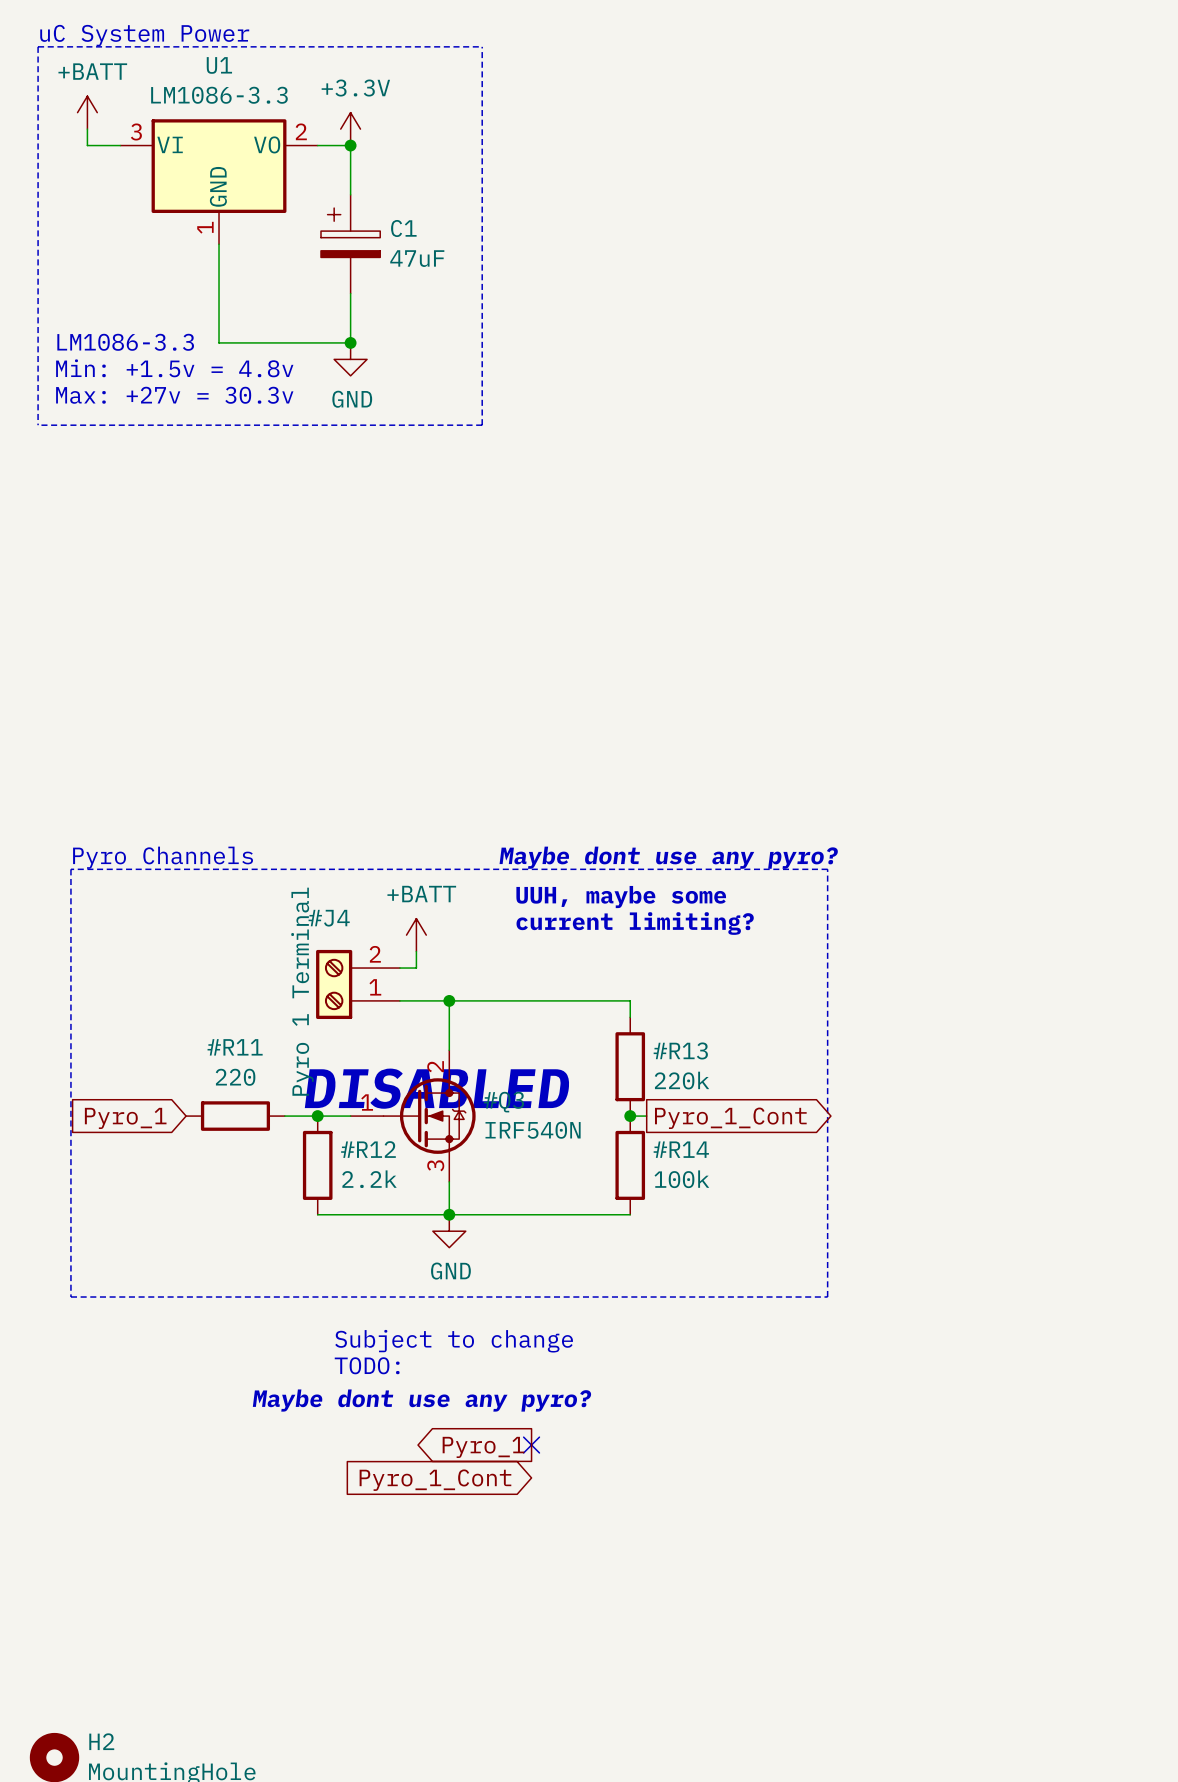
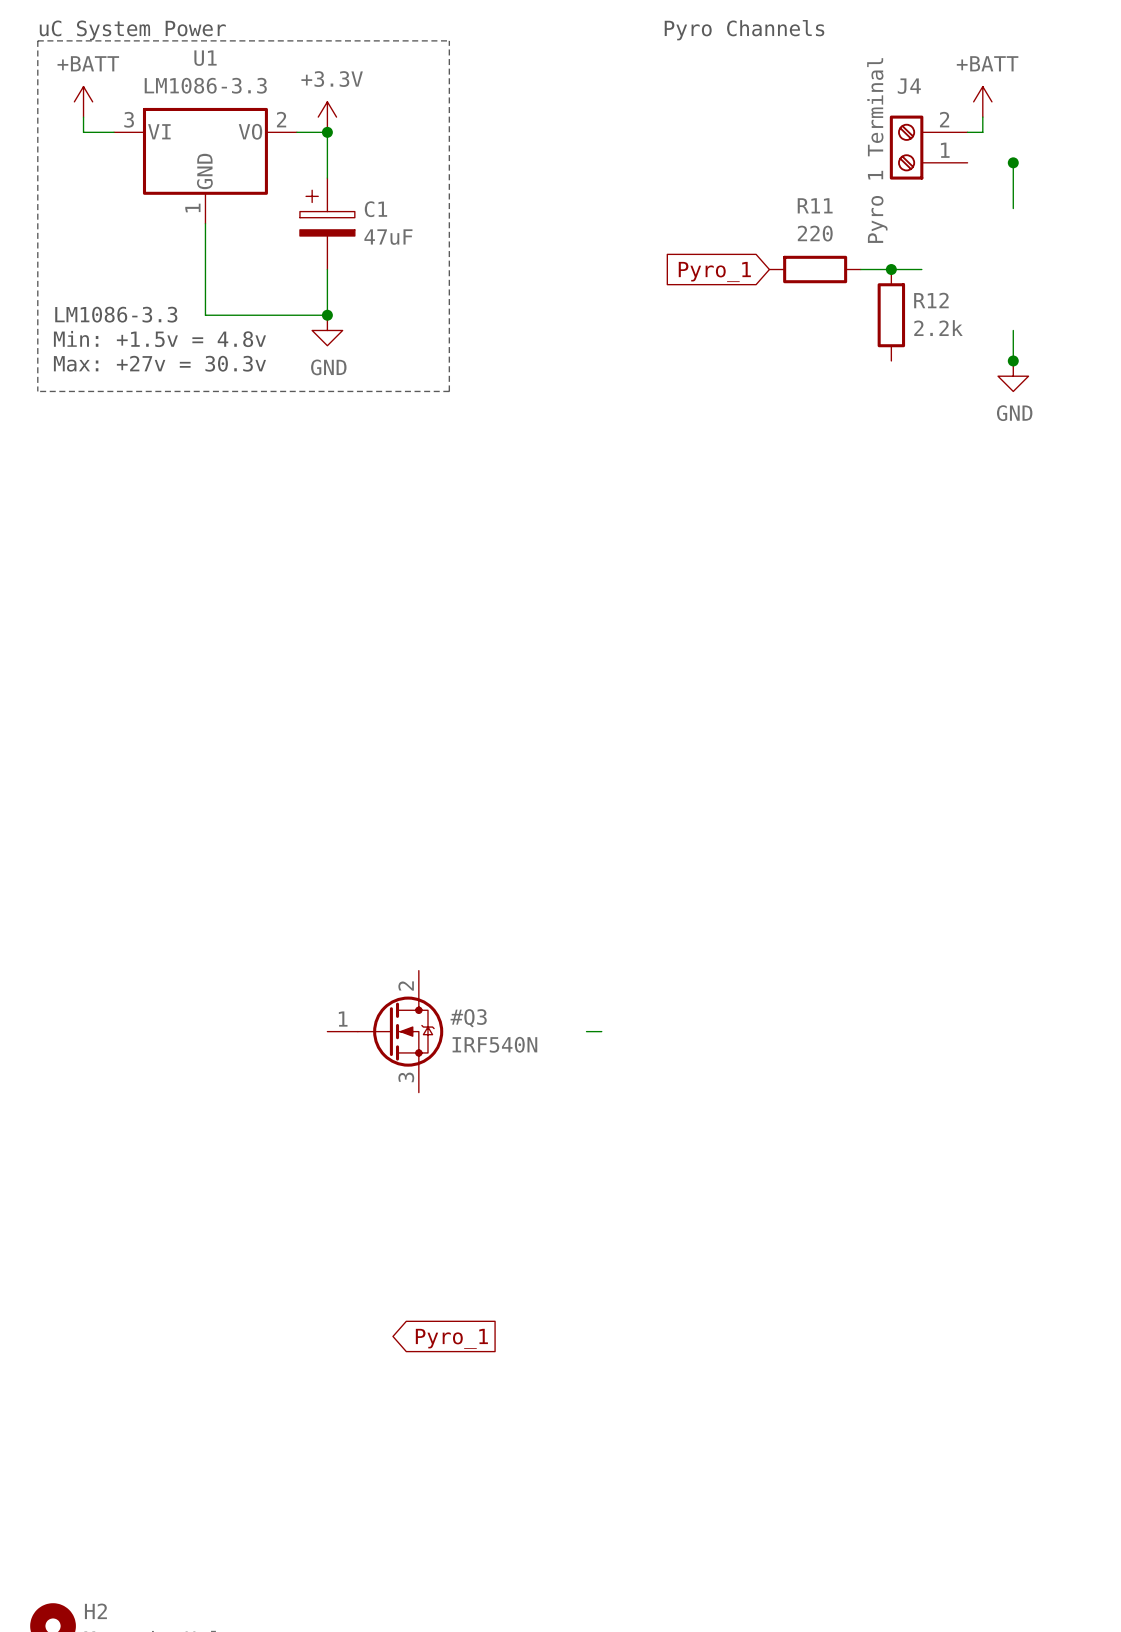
text: none -> Pyro Channels (744, 30)
power symbol: none -> +BATT (982, 101)
wire: none -> (982, 117) (982, 132) (967, 132)
J4: none -> Pyro 1 Terminal (928, 147)
wire: none -> (1013, 162) (1013, 208)
junction: none -> (1013, 162)
R11: none -> 220 (815, 269)
wire: none -> (860, 269) (921, 269)
junction: none -> (891, 269)
global label: none -> Pyro_1 (714, 271)
R12: none -> 2.2k (891, 315)
wire: none -> (1013, 330) (1013, 360)
junction: none -> (1013, 360)
power symbol: none -> GND (1013, 376)
text: Pyro Channels (163, 857) -> none
text: Maybe dont use any pyro? (668, 857) -> none
line: (70, 869) (70, 1297) (827, 1297) (827, 869) (70, 869) -> none
text: UUH, maybe some (621, 897) -> none
text: current limiting? (635, 923) -> none
power symbol: +BATT (416, 935) -> none
wire: (416, 951) (416, 968) (399, 968) -> none
#J4: Pyro 1 Terminal (358, 984) -> none
wire: (399, 1000) (630, 1000) (630, 1017) -> none
wire: (449, 1000) (449, 1050) -> none
junction: (449, 1000) -> none
#R13: 220k (630, 1066) -> none
text: DISABLED (437, 1088) -> none
#R11: 220 (235, 1116) -> none
wire: (284, 1116) (350, 1116) -> none
junction: (317, 1116) -> none
junction: (630, 1116) -> none
global label: Pyro_1 (125, 1118) -> none
global label: Pyro_1_Cont (730, 1118) -> none
#R12: 2.2k (317, 1165) -> none
#R14: 100k (630, 1165) -> none
wire: (449, 1181) (449, 1214) -> none
wire: (317, 1214) (630, 1214) -> none
junction: (449, 1214) -> none
power symbol: GND (449, 1231) -> none
text: Subject to change (454, 1341) -> none
text: TODO: (367, 1365) -> none
text: Maybe dont use any pyro? (422, 1400) -> none
no-connect mark: (531, 1445) -> none
global label: Pyro_1_Cont (435, 1480) -> none

